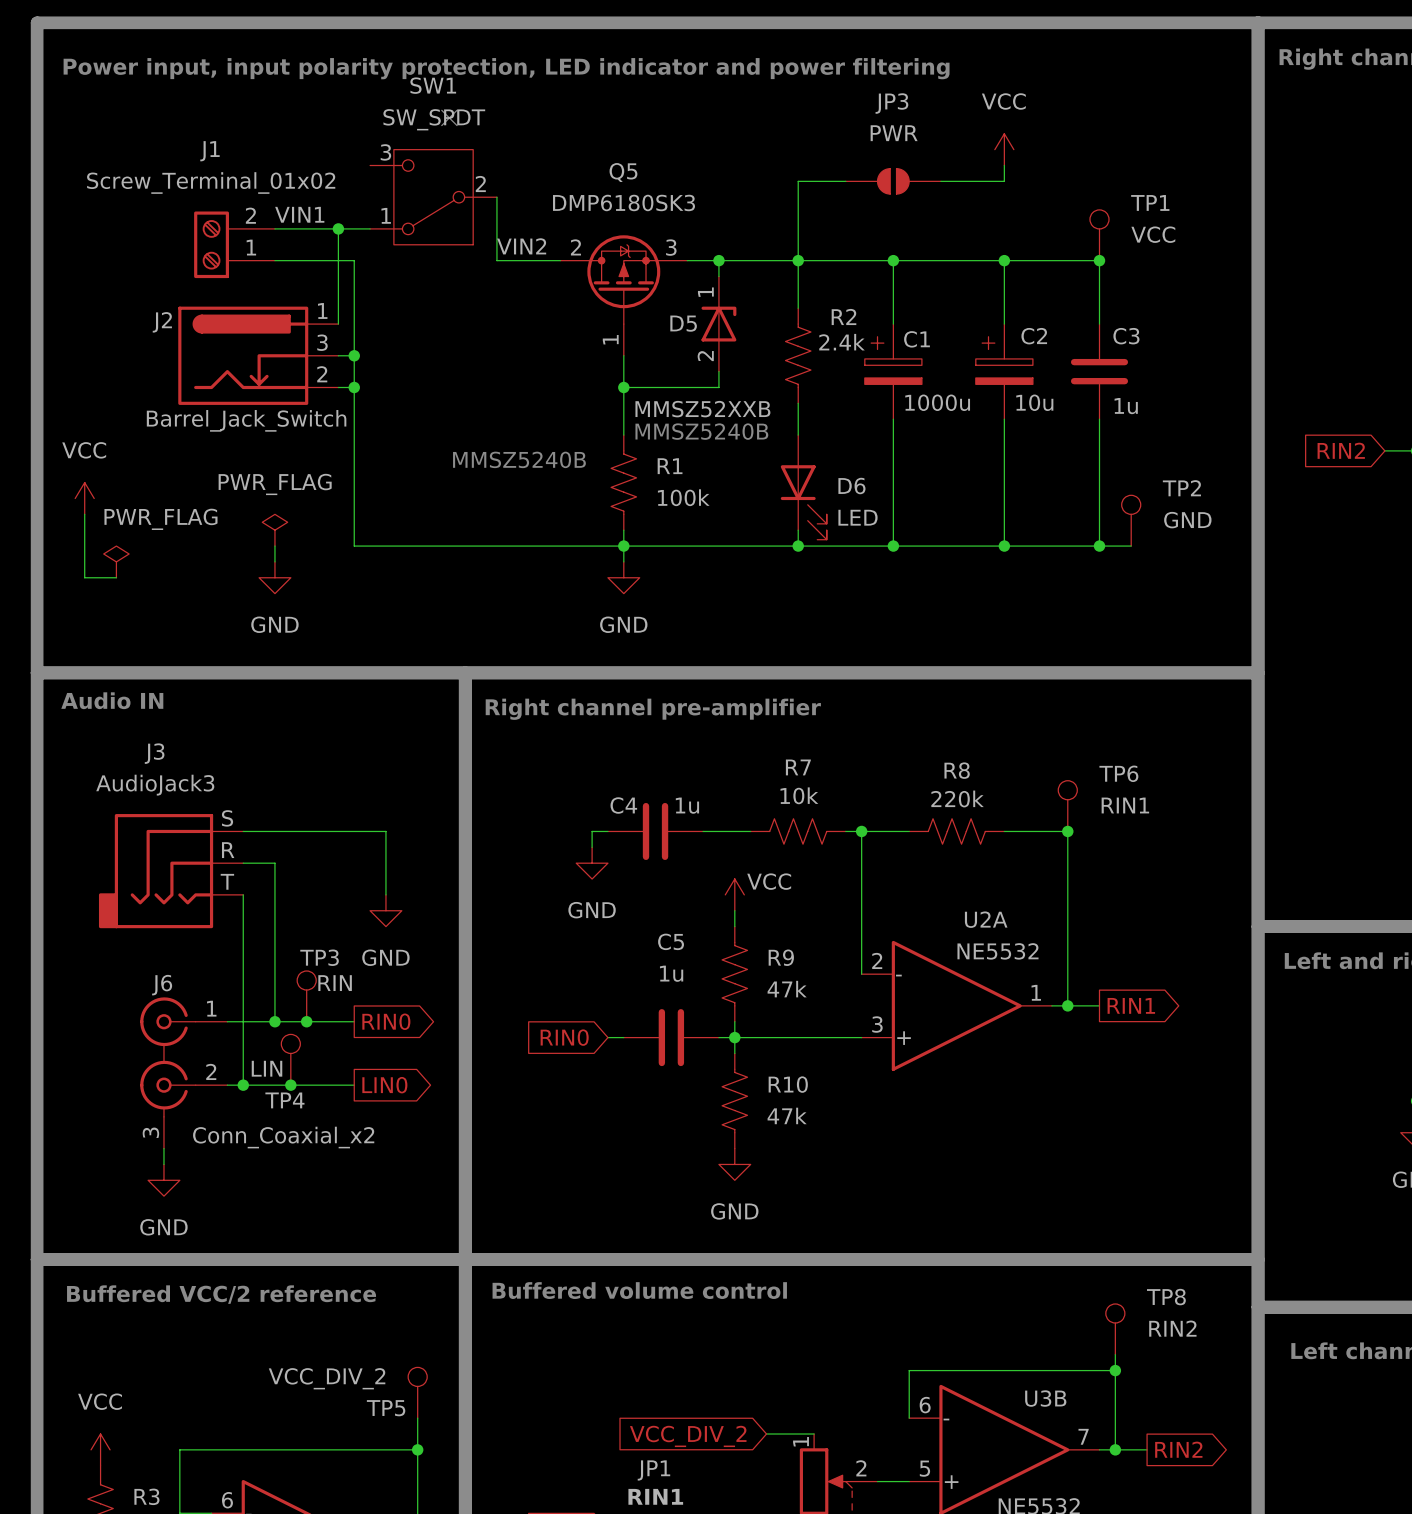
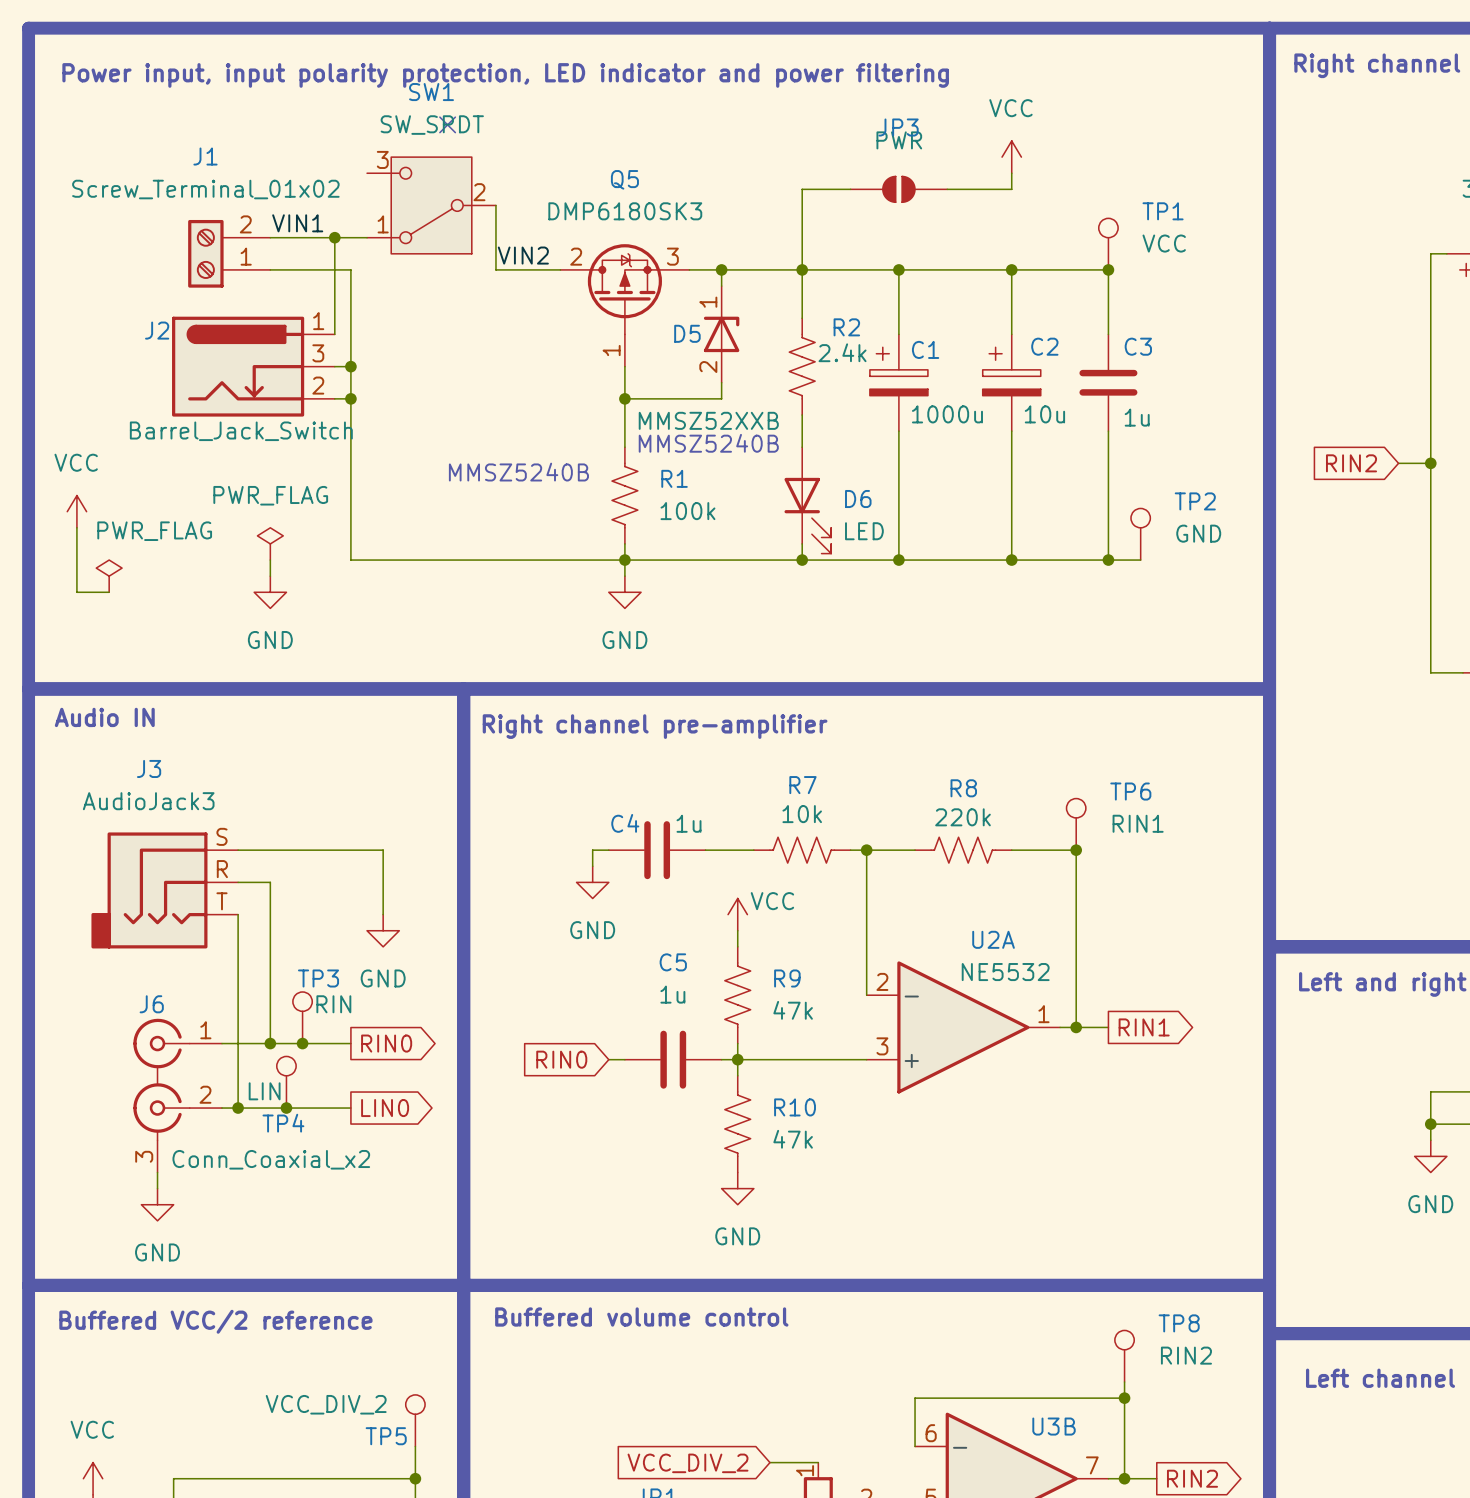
JP3 name position: JP3 (891, 103) -> JP3 (898, 127)

